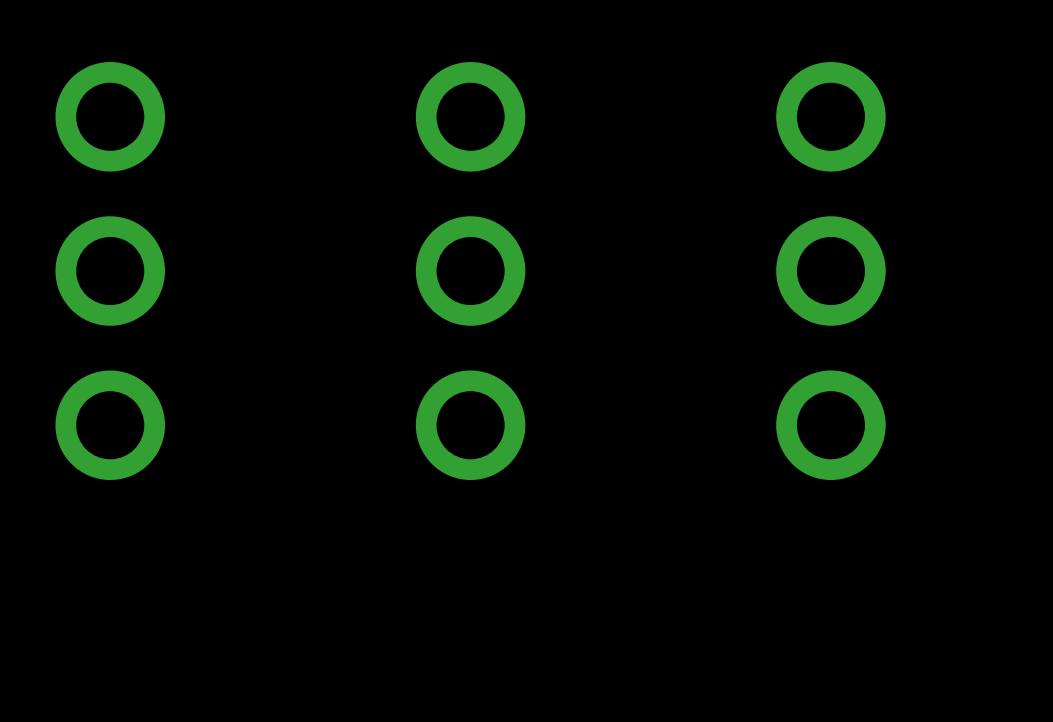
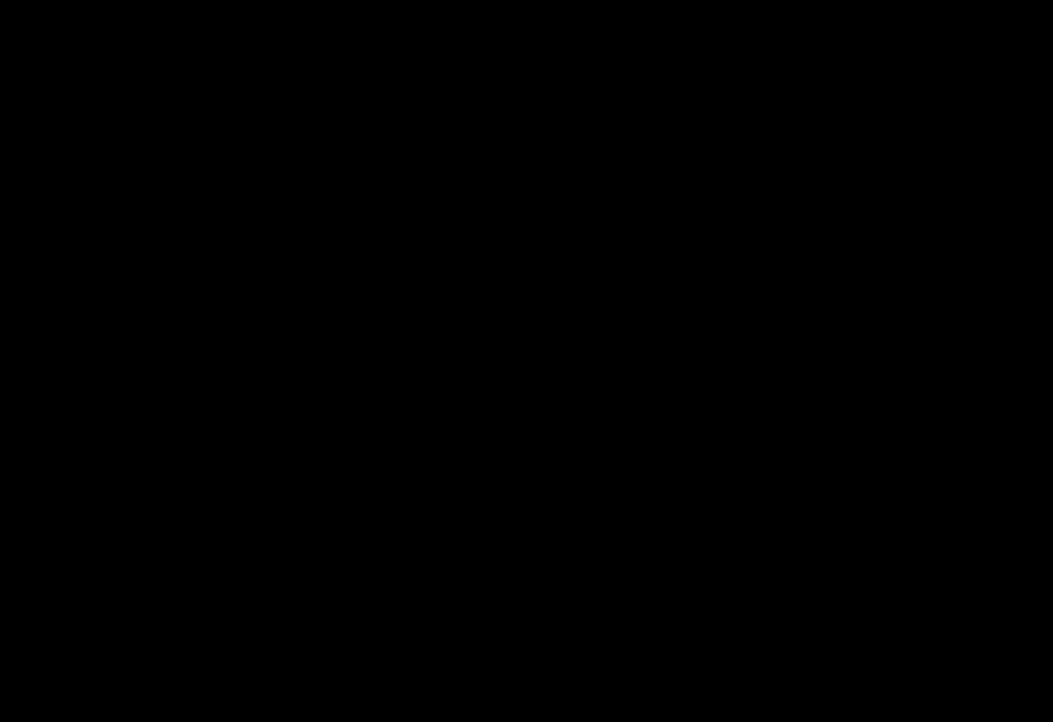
part: (110, 271) -> none
part: (470, 271) -> none
part: (830, 271) -> none

